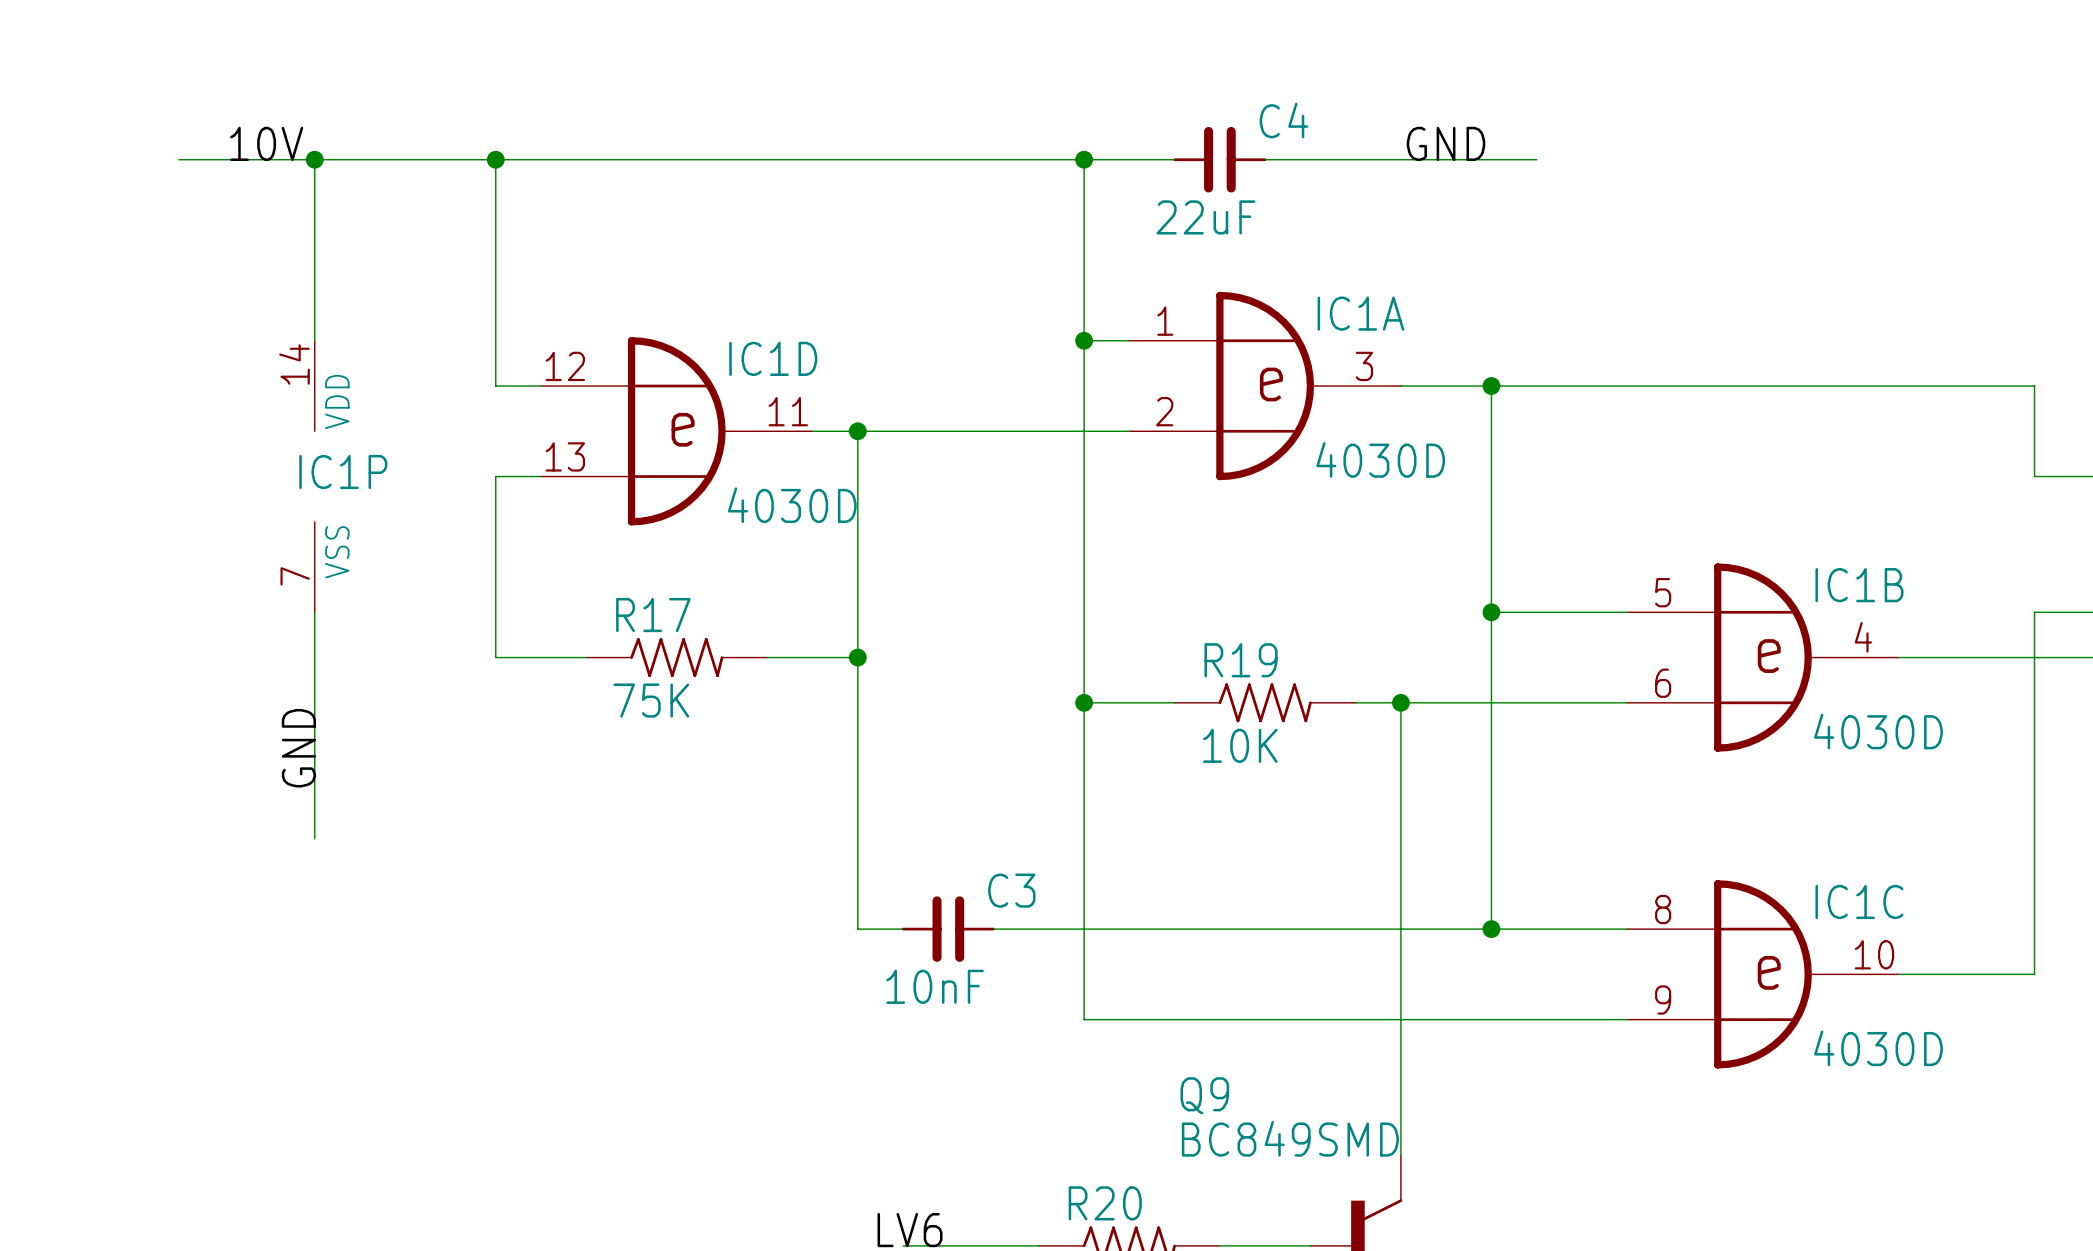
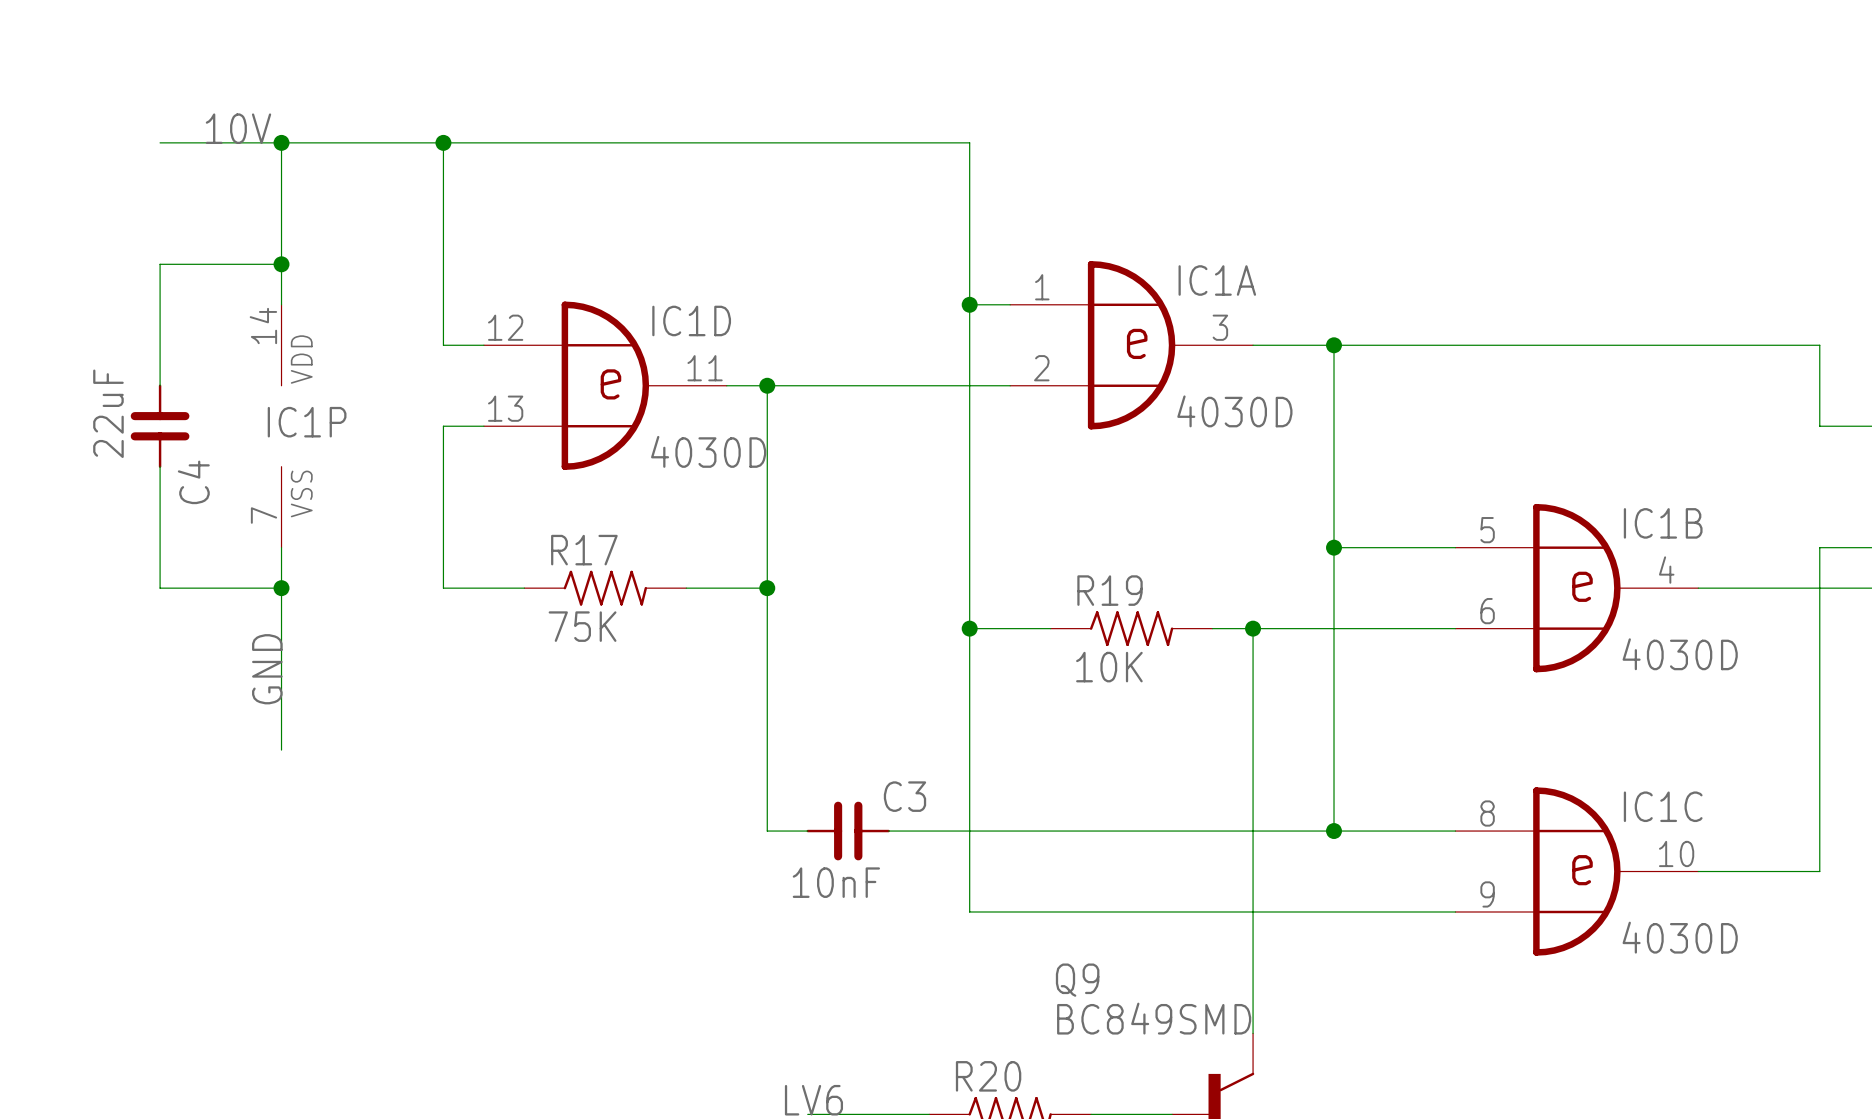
label: GND (1446, 143) -> none
wire: (1084, 159) (1174, 159) -> none
junction: (1084, 159) -> none
C4 rotation: 0° (1219, 159) -> 90° clockwise (160, 426)
C4 position: (1219, 159) -> (160, 426)
wire: (1265, 159) (1536, 159) -> none
wire: none -> (281, 264) (160, 264) (160, 385)
junction: none -> (281, 264)
wire: none -> (160, 466) (160, 588) (281, 588)
junction: none -> (281, 588)

